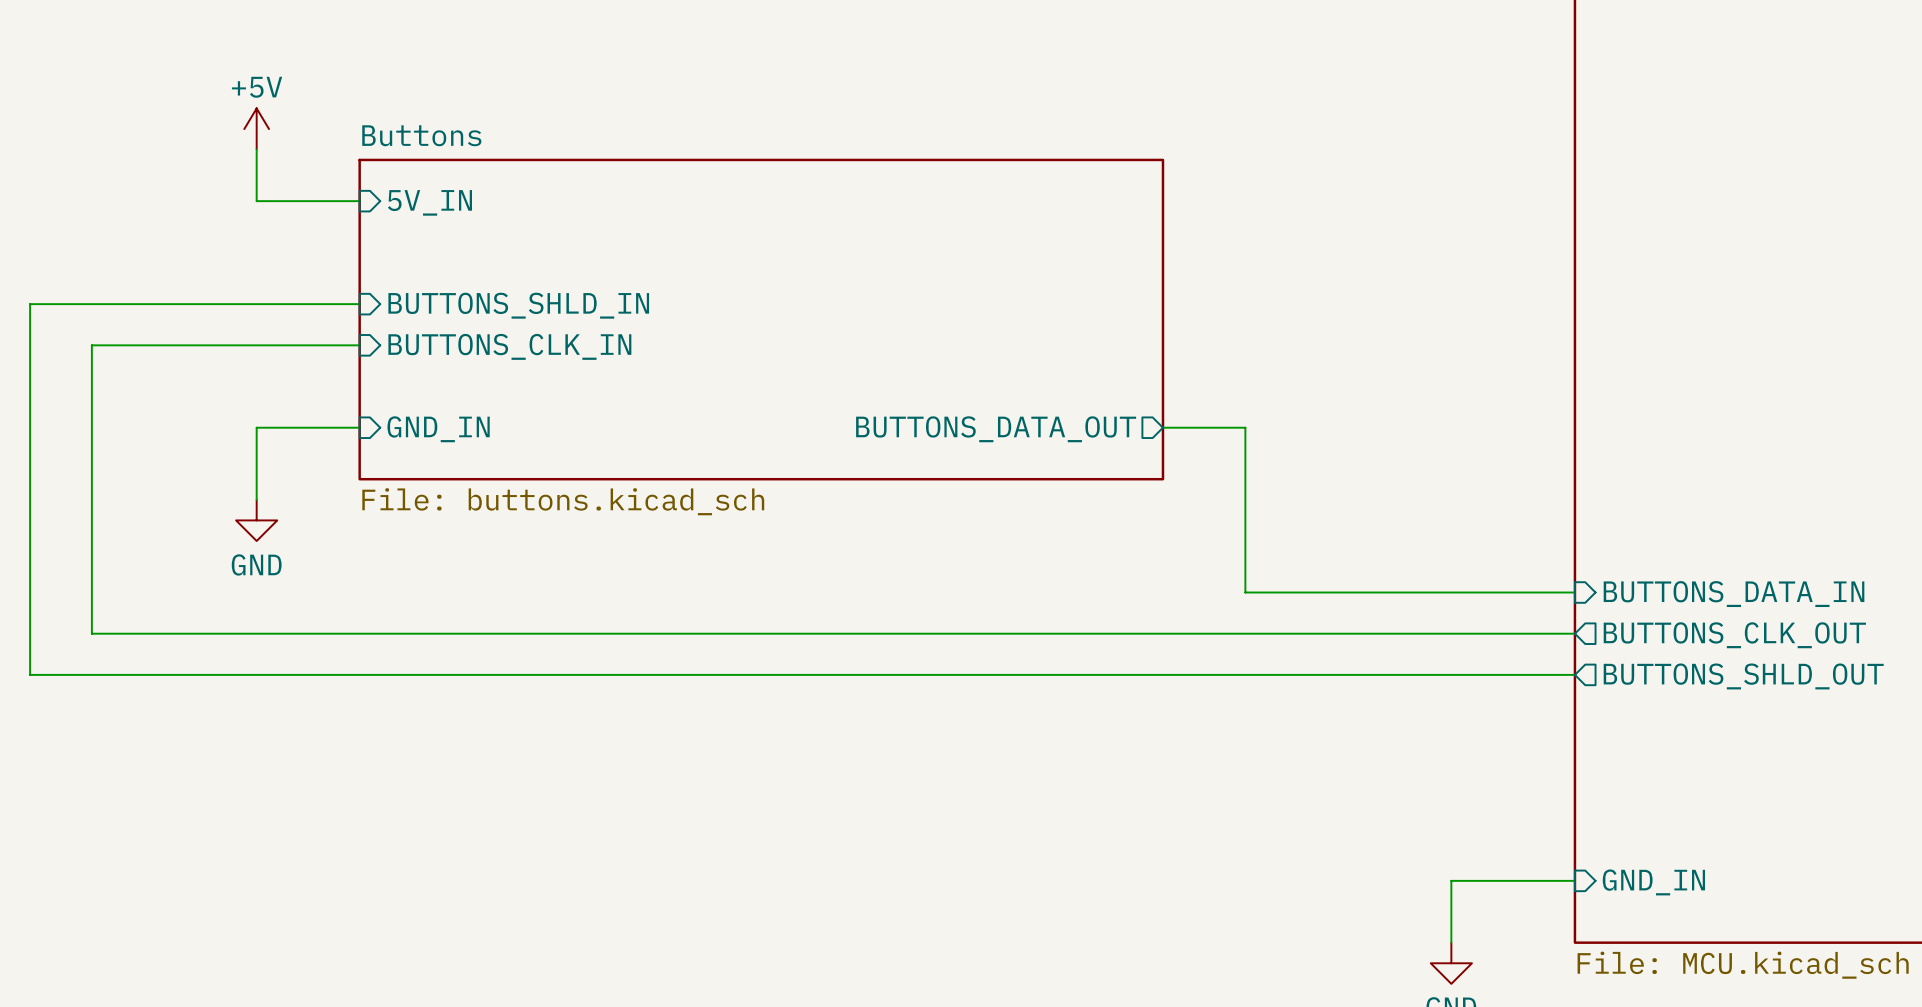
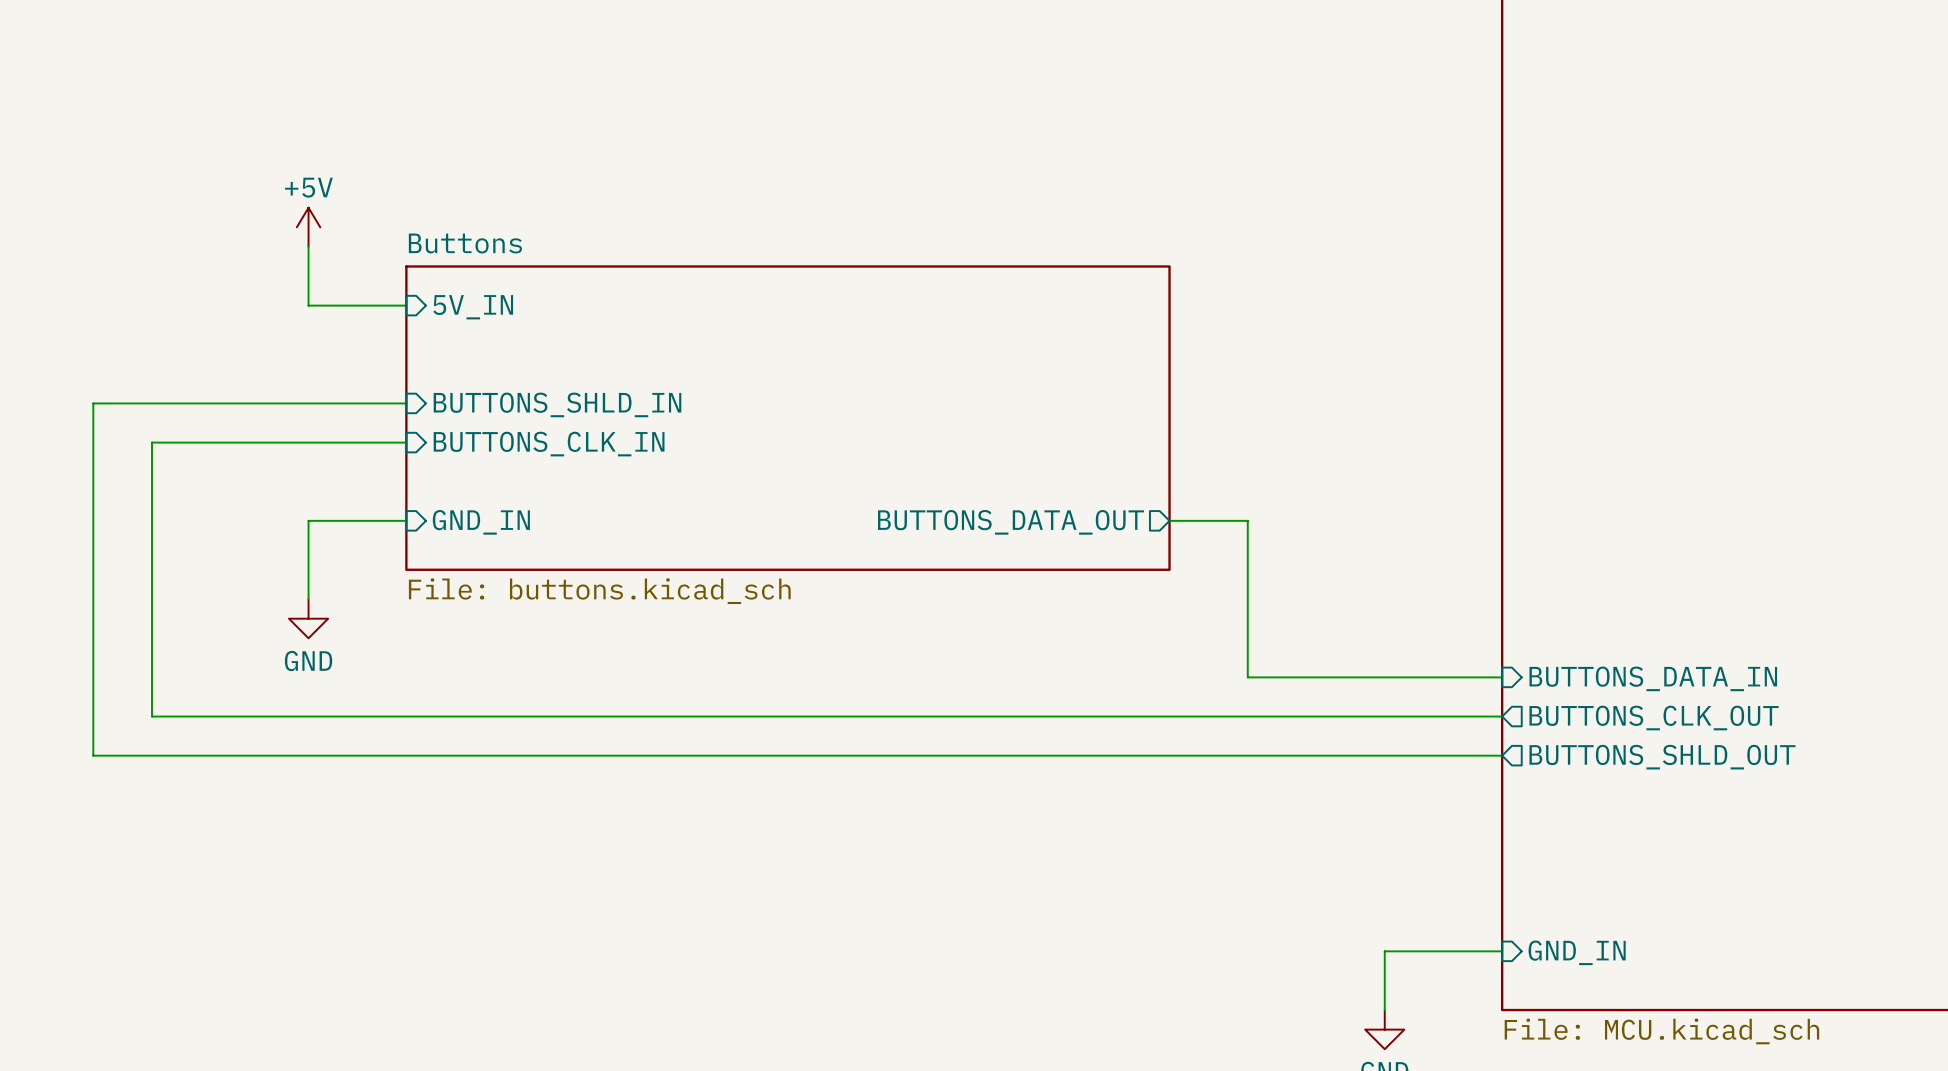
power symbol position: +5V (256, 129) -> +5V (308, 227)
wire: (256, 149) (256, 201) (318, 201) -> (308, 246) (308, 305)
wire: none -> (347, 305) (406, 305)
sheet pin position: 5V_IN (429, 202) -> 5V_IN (473, 307)
wire: (91, 304) (30, 304) (30, 674) (91, 674) -> none
wire: none -> (347, 403) (406, 403)
sheet pin position: BUTTONS_SHLD_IN (518, 305) -> BUTTONS_SHLD_IN (557, 404)
sheet Buttons position: (761, 319) -> (787, 418)
wire: (91, 345) (153, 345) -> (93, 442) (93, 403)
wire: none -> (152, 442) (152, 716)
wire: none -> (347, 442) (406, 442)
sheet pin position: BUTTONS_CLK_IN (509, 346) -> BUTTONS_CLK_IN (549, 444)
wire: (318, 427) (256, 427) (256, 499) -> (308, 520) (308, 599)
wire: none -> (347, 520) (406, 520)
wire: (1162, 427) (1224, 427) -> none
wire: (1245, 427) (1245, 592) (1307, 592) -> (1189, 520) (1247, 520) (1247, 677)
sheet pin position: GND_IN (438, 429) -> GND_IN (481, 522)
sheet pin position: BUTTONS_DATA_OUT (996, 429) -> BUTTONS_DATA_OUT (1010, 522)
power symbol position: GND (256, 520) -> GND (308, 618)
wire: (91, 633) (153, 633) -> (93, 716) (93, 755)

